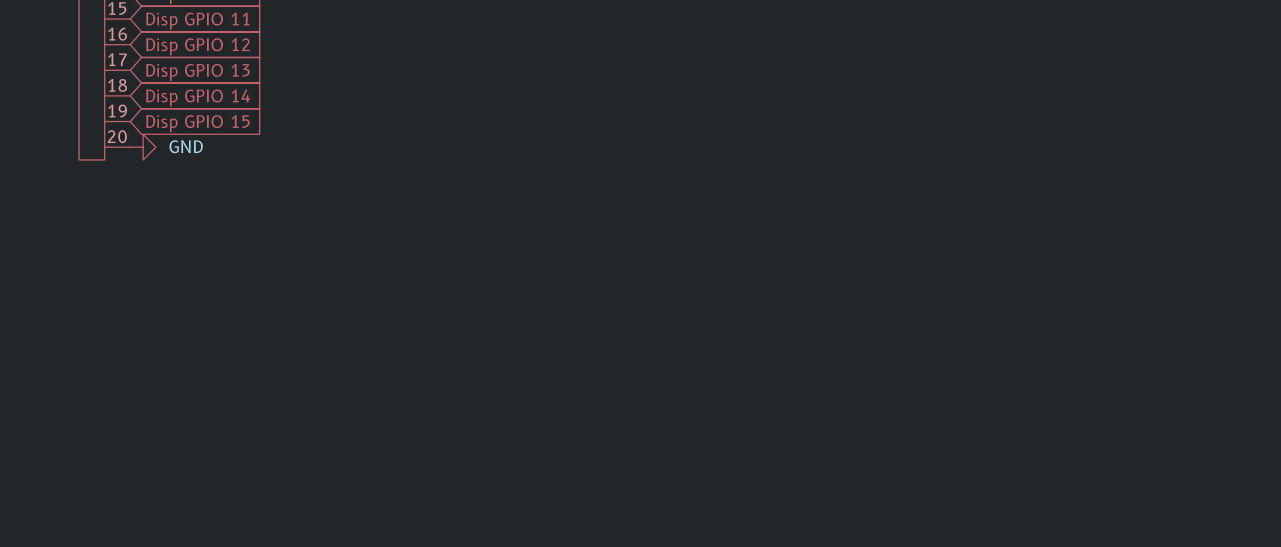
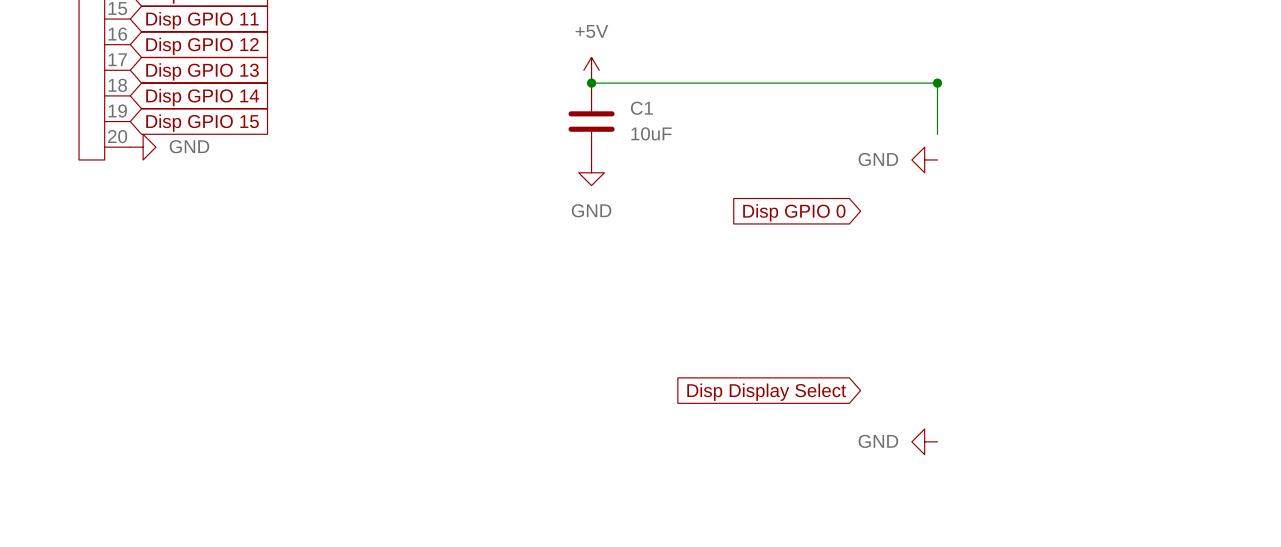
power symbol: none -> +5V (591, 70)
wire: none -> (591, 83) (937, 83) (937, 134)
junction: none -> (591, 83)
junction: none -> (937, 83)
C1: none -> 10uF (591, 121)
power symbol: none -> GND (924, 159)
power symbol: none -> GND (591, 172)
global label: none -> Disp GPIO 0 (794, 212)
global label: none -> Disp Display Select (766, 392)
power symbol: none -> GND (924, 441)

